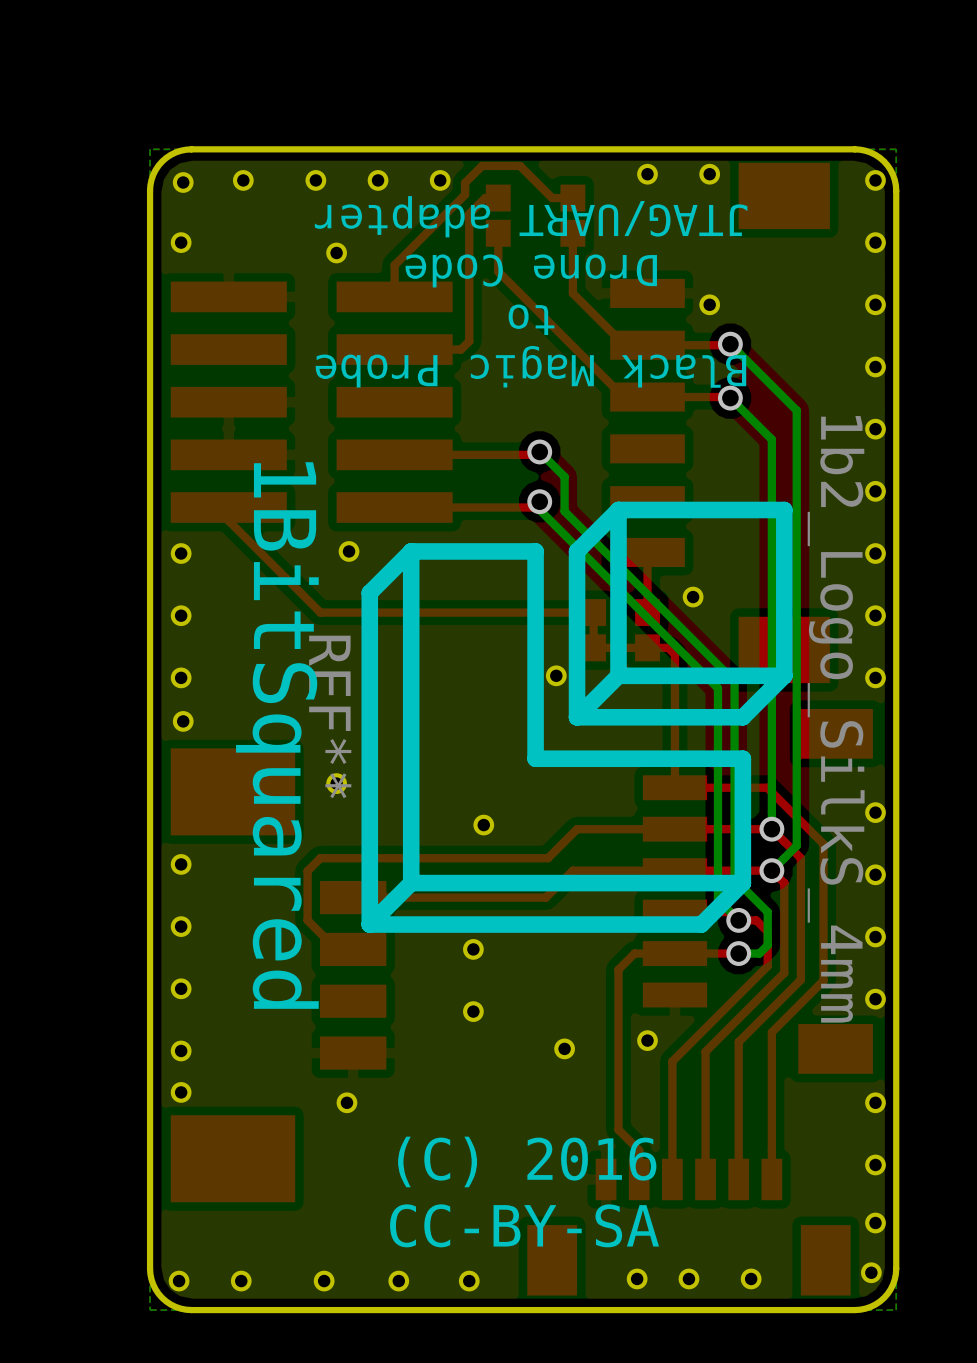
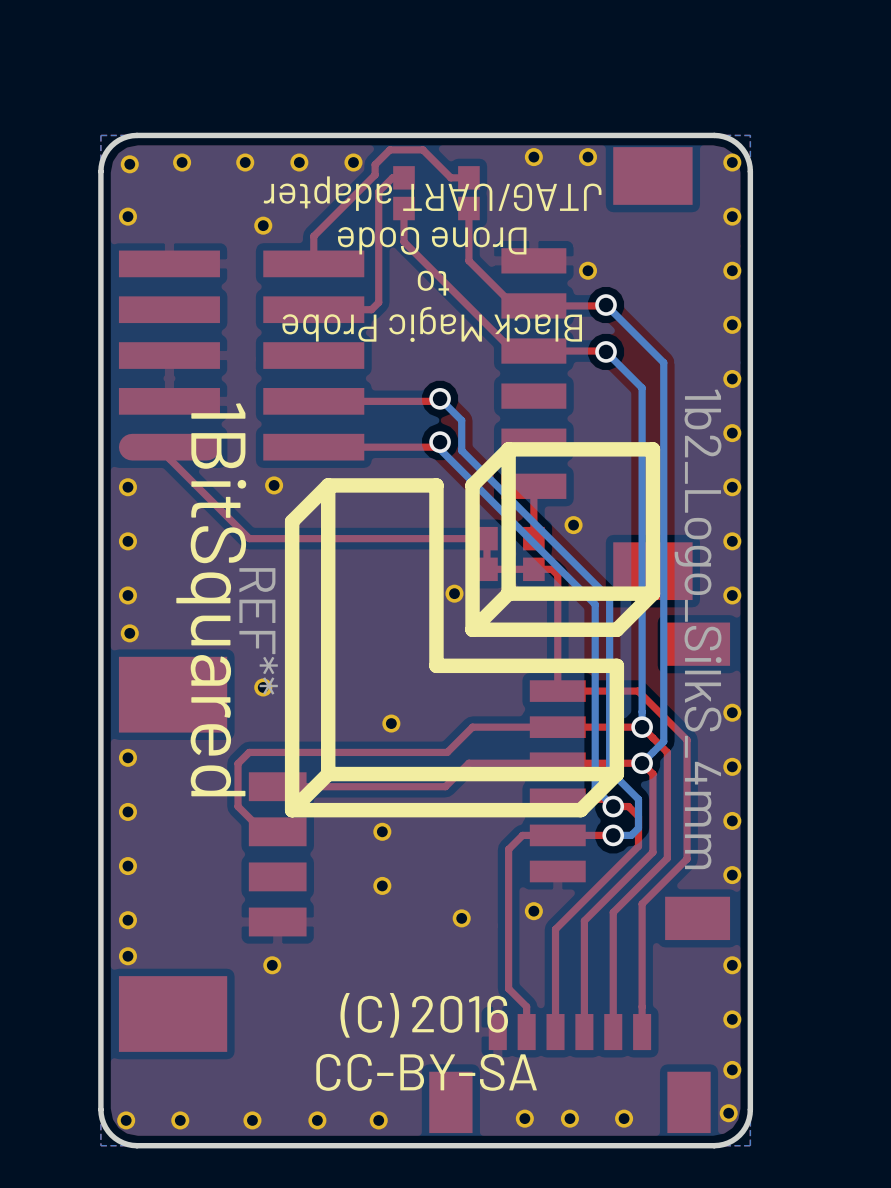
part footprint: [170, 281, 453, 523] -> [118, 250, 365, 461]

